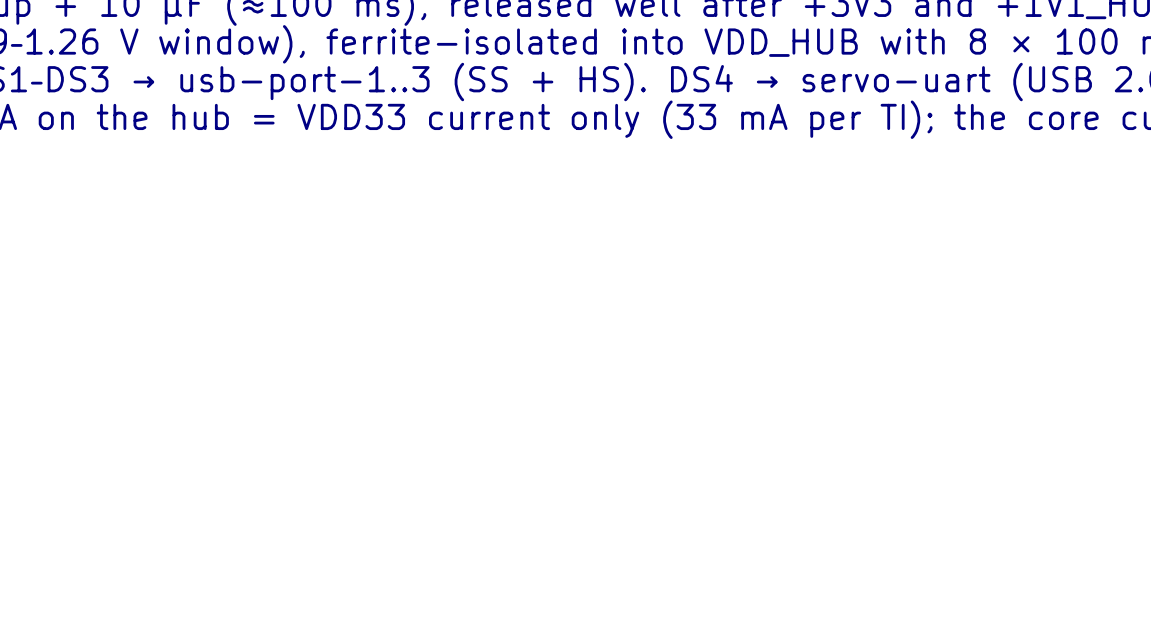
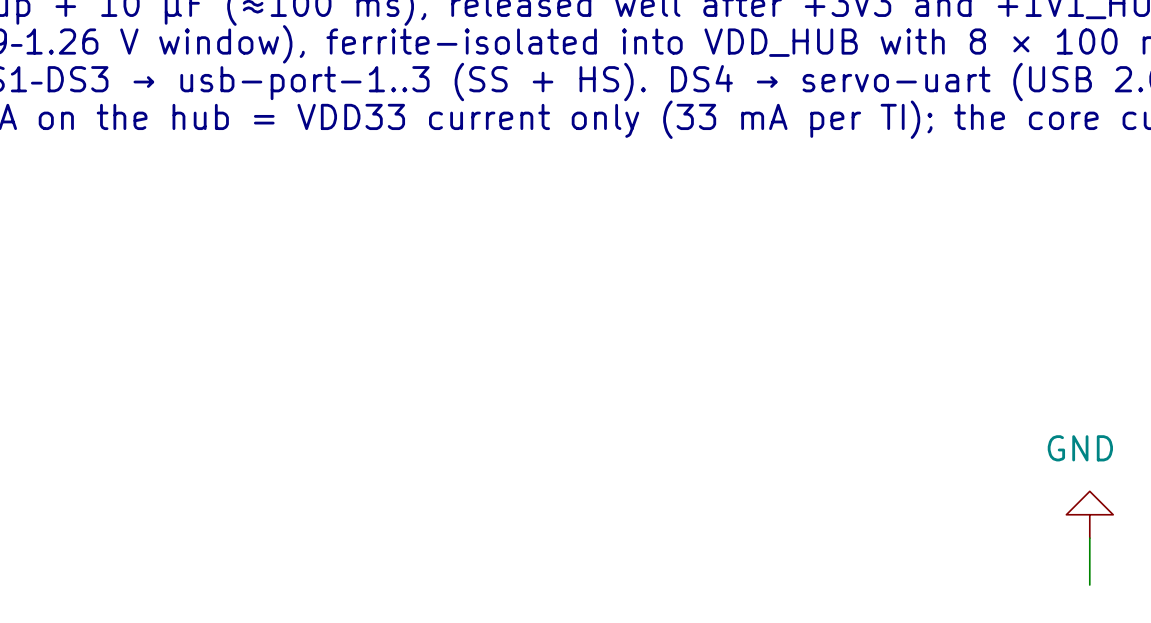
power symbol: none -> GND (1089, 514)
wire: none -> (1089, 538) (1089, 585)

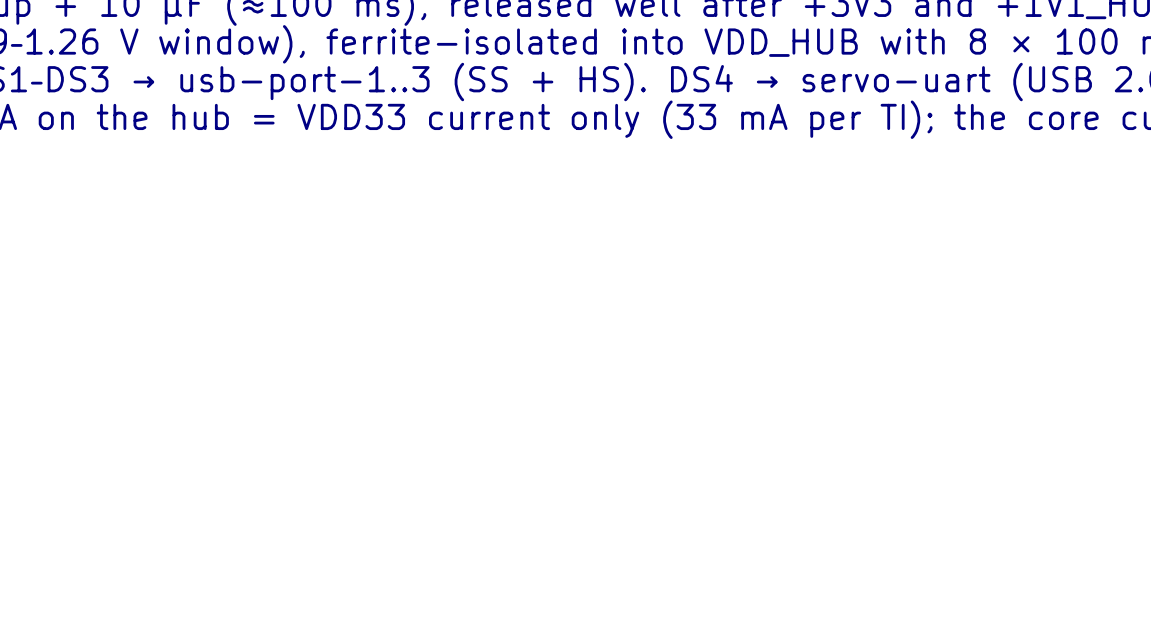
power symbol: GND (1089, 514) -> none
wire: (1089, 538) (1089, 585) -> none

